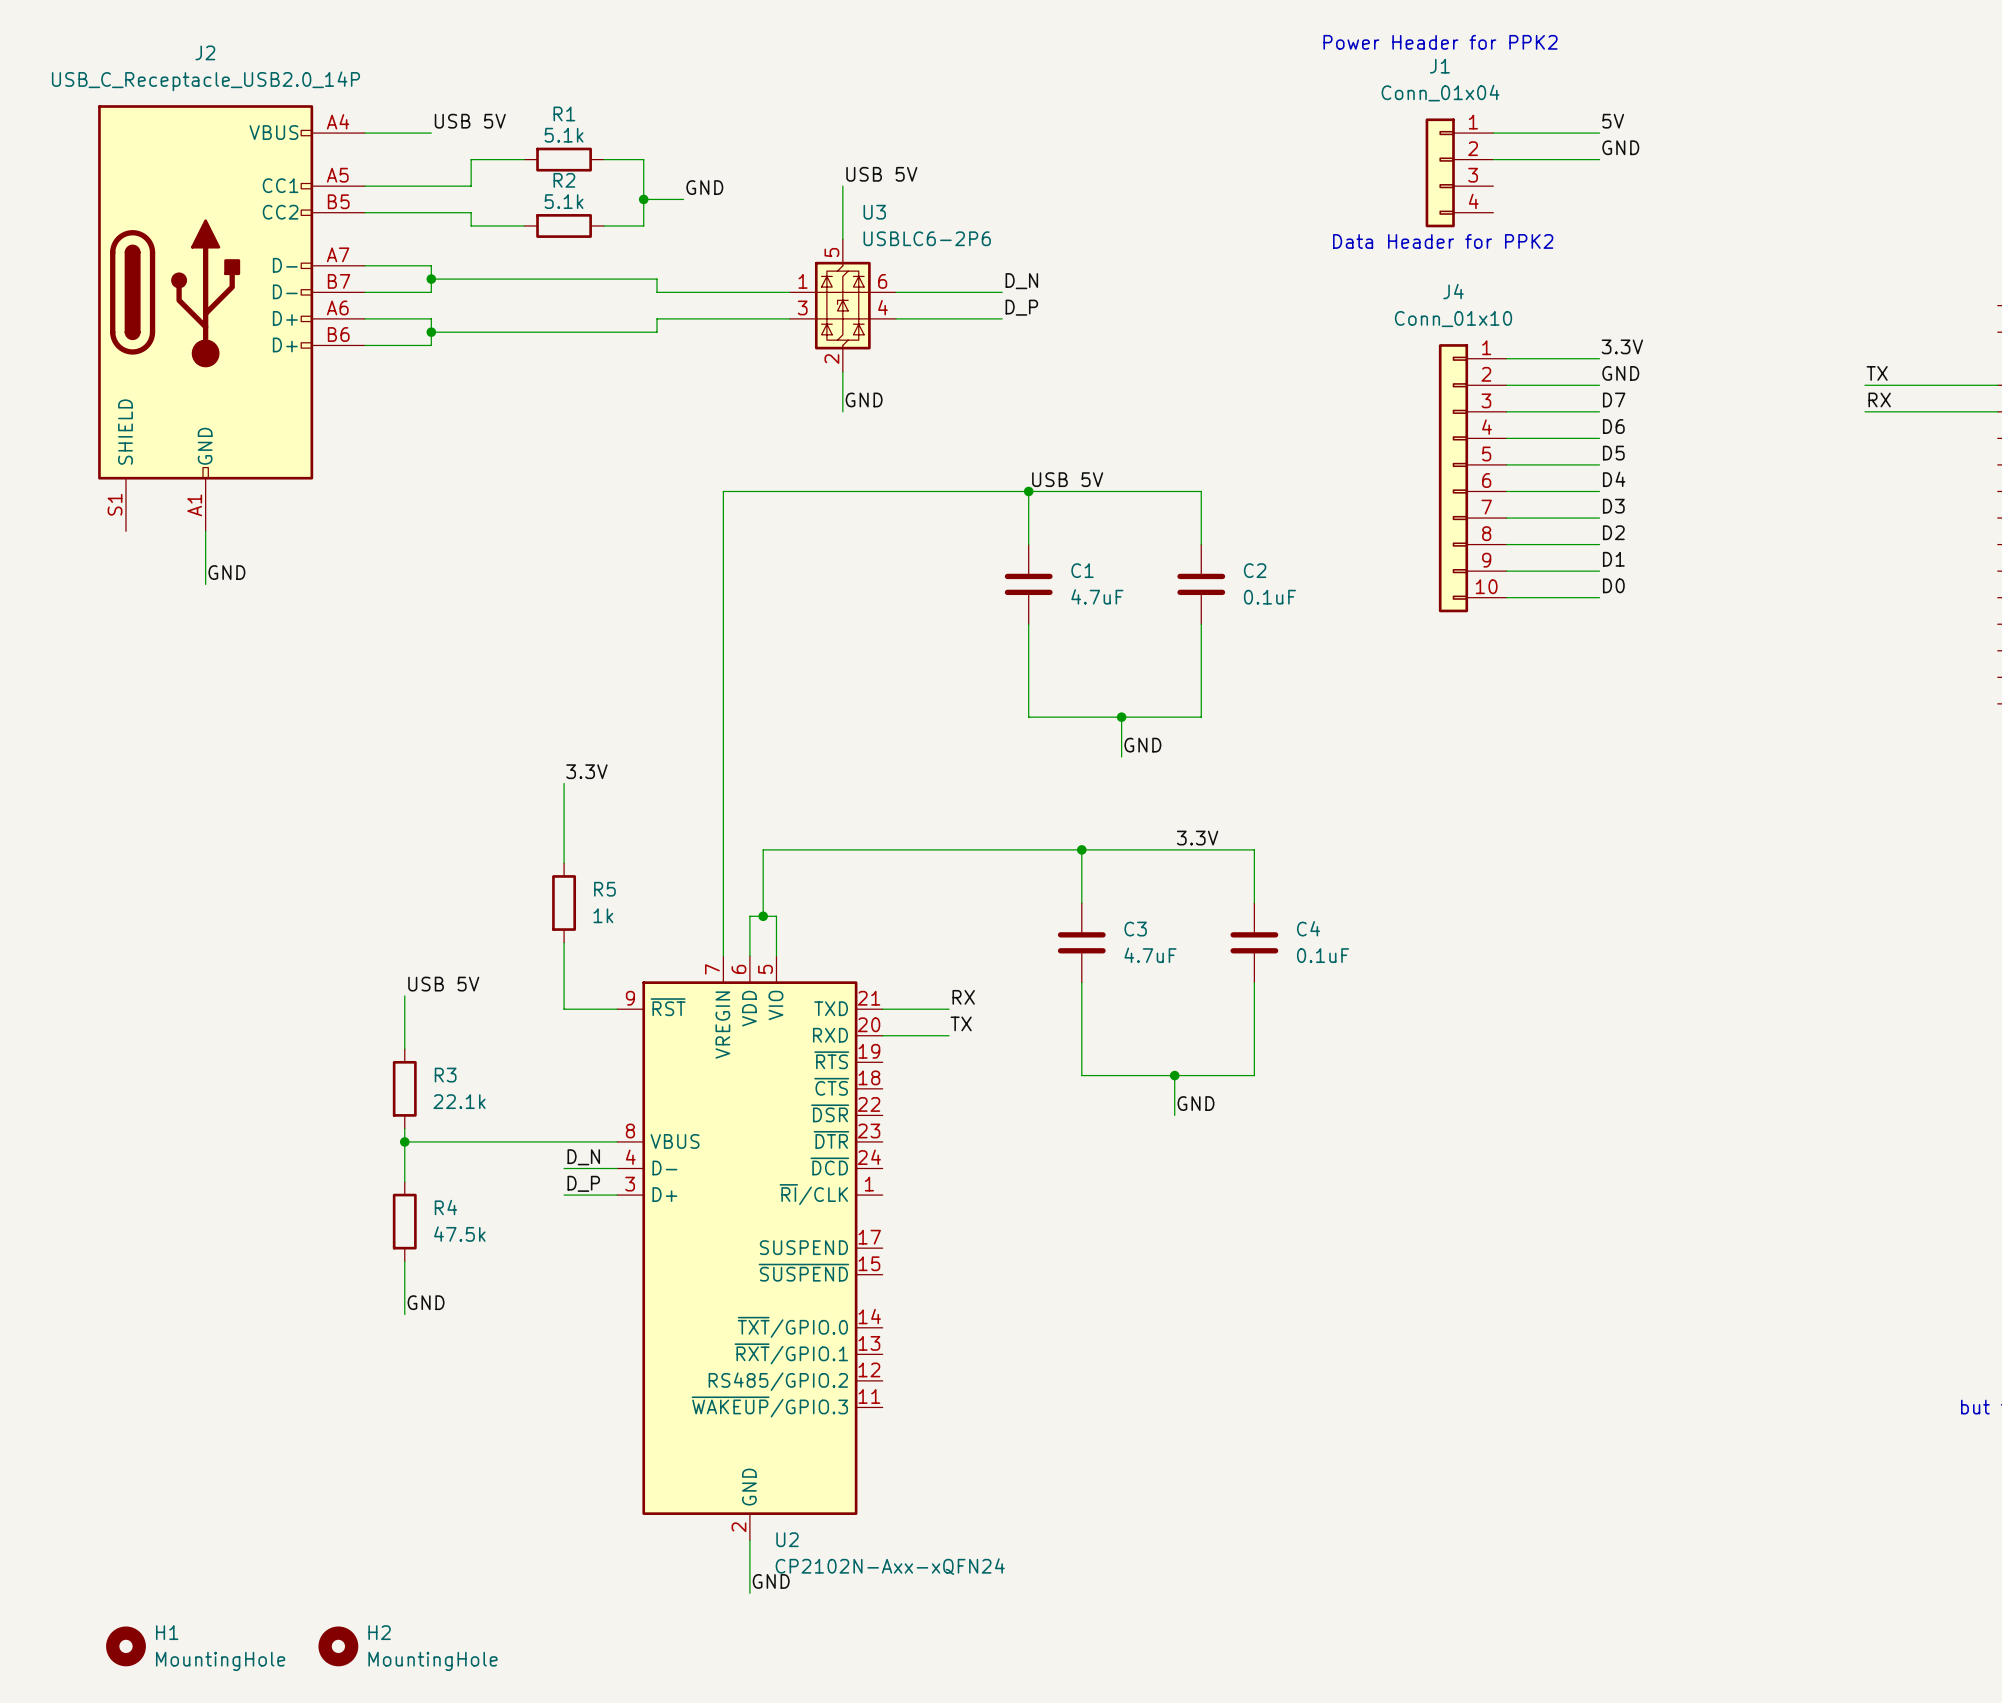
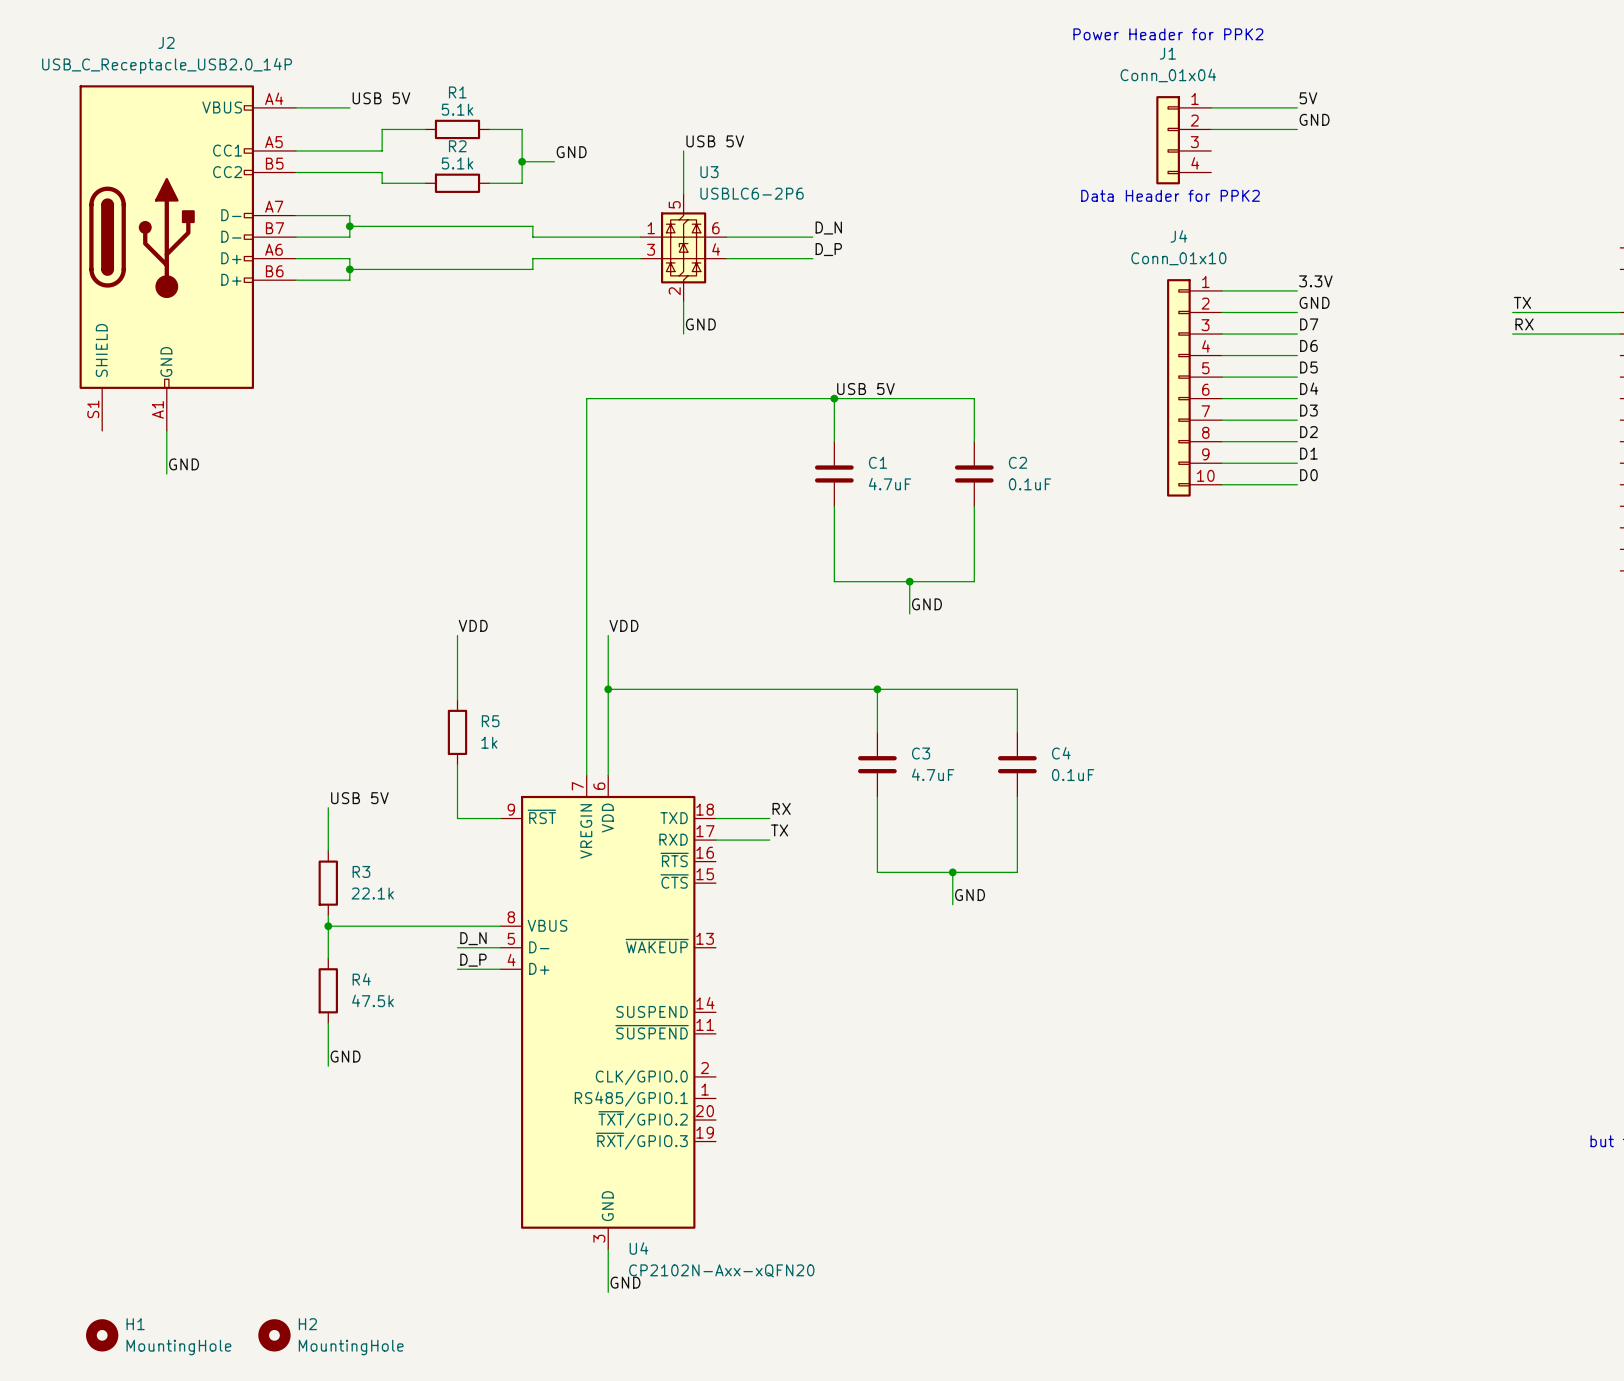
label: 3.3V (586, 771) -> VDD (473, 625)
label: none -> VDD (623, 625)
label: 3.3V (1197, 838) -> none
junction: none -> (608, 689)
wire: (763, 849) (763, 916) -> (619, 689) (608, 689)
wire: (749, 916) (776, 916) (776, 956) -> (608, 743) (608, 635)
junction: (763, 916) -> none
U2: CP2102N-Axx-xQFN24 (749, 1248) -> none
U4: none -> CP2102N-Axx-xQFN20 (608, 1012)

